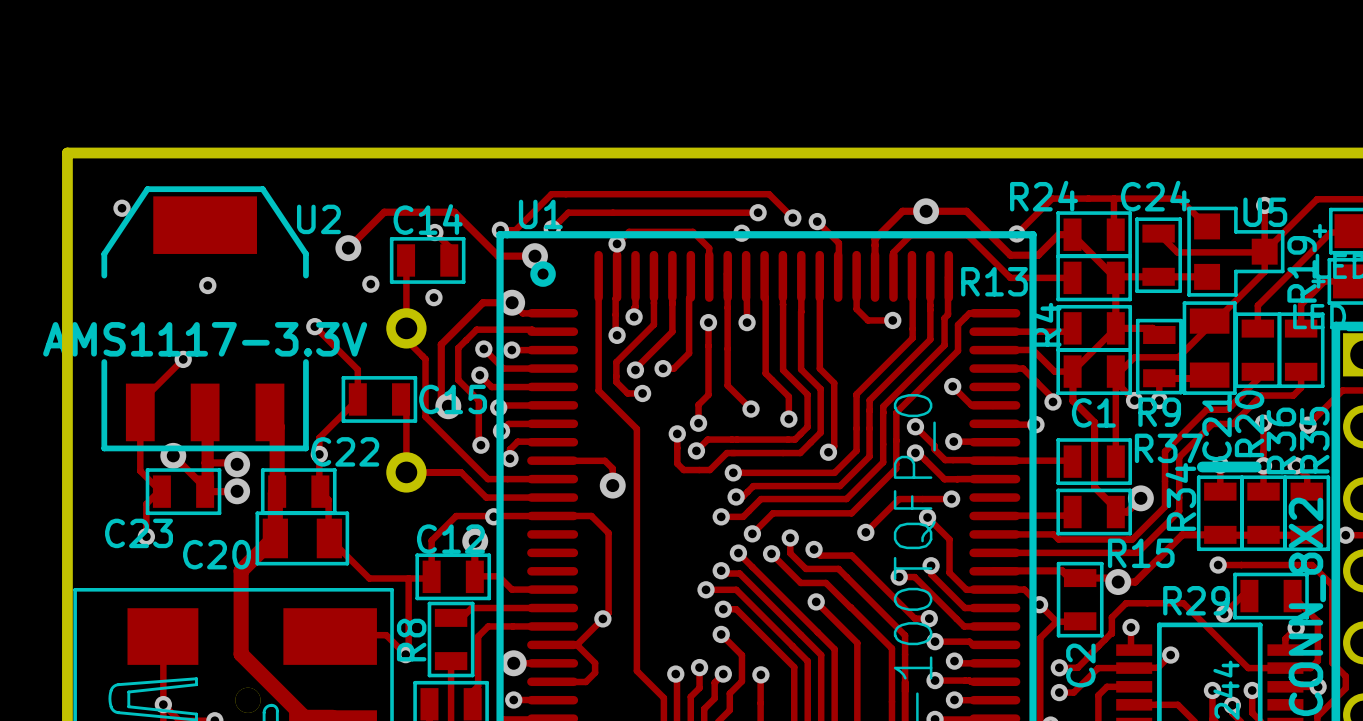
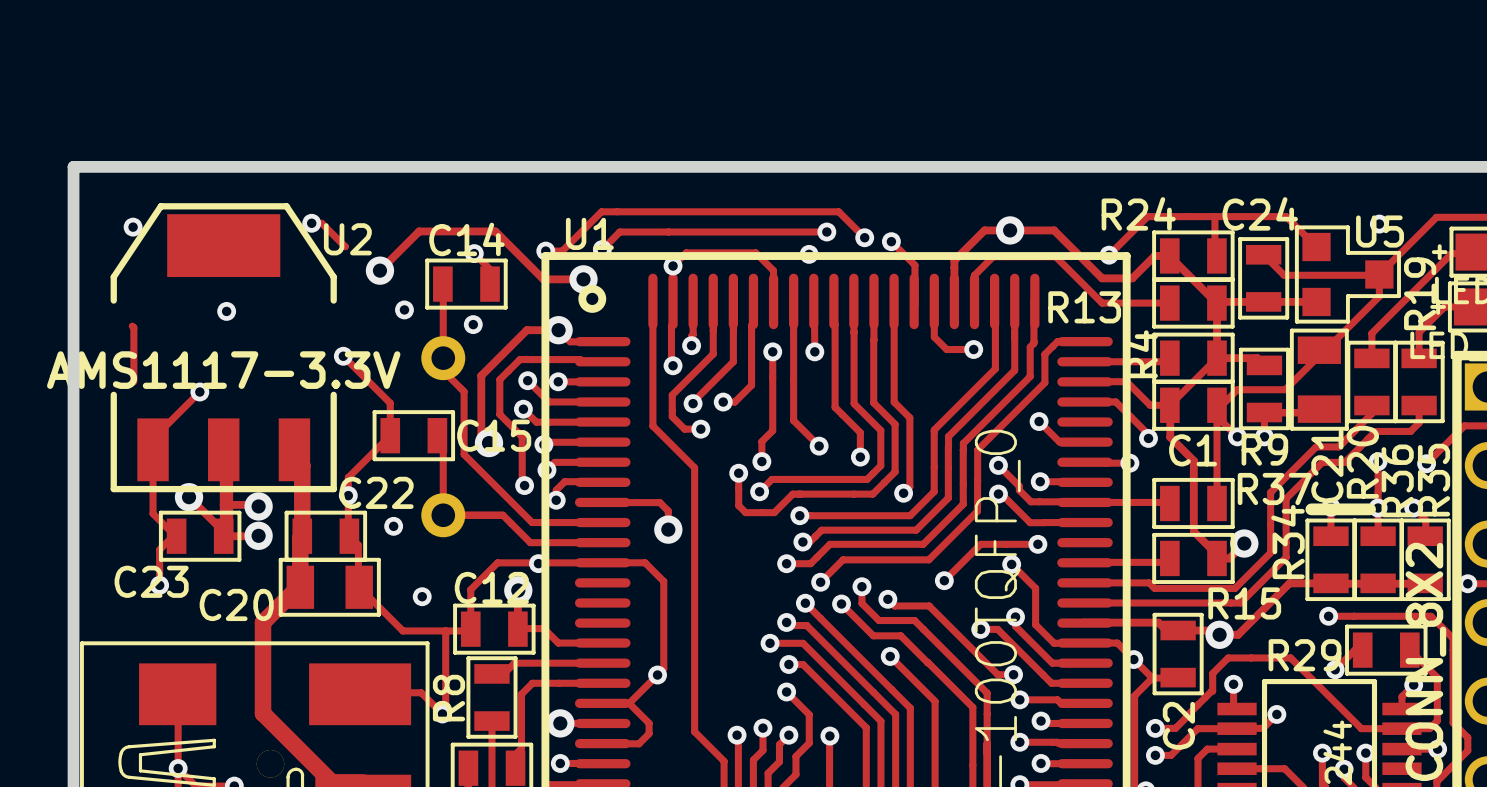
track: none -> (311, 223) (321, 223) (345, 246)
via: none -> (311, 223)
track: (1264, 205) (1264, 251) -> none
track: none -> (132, 326) (133, 327) (133, 381)
via: none -> (393, 526)
via: none -> (422, 596)

